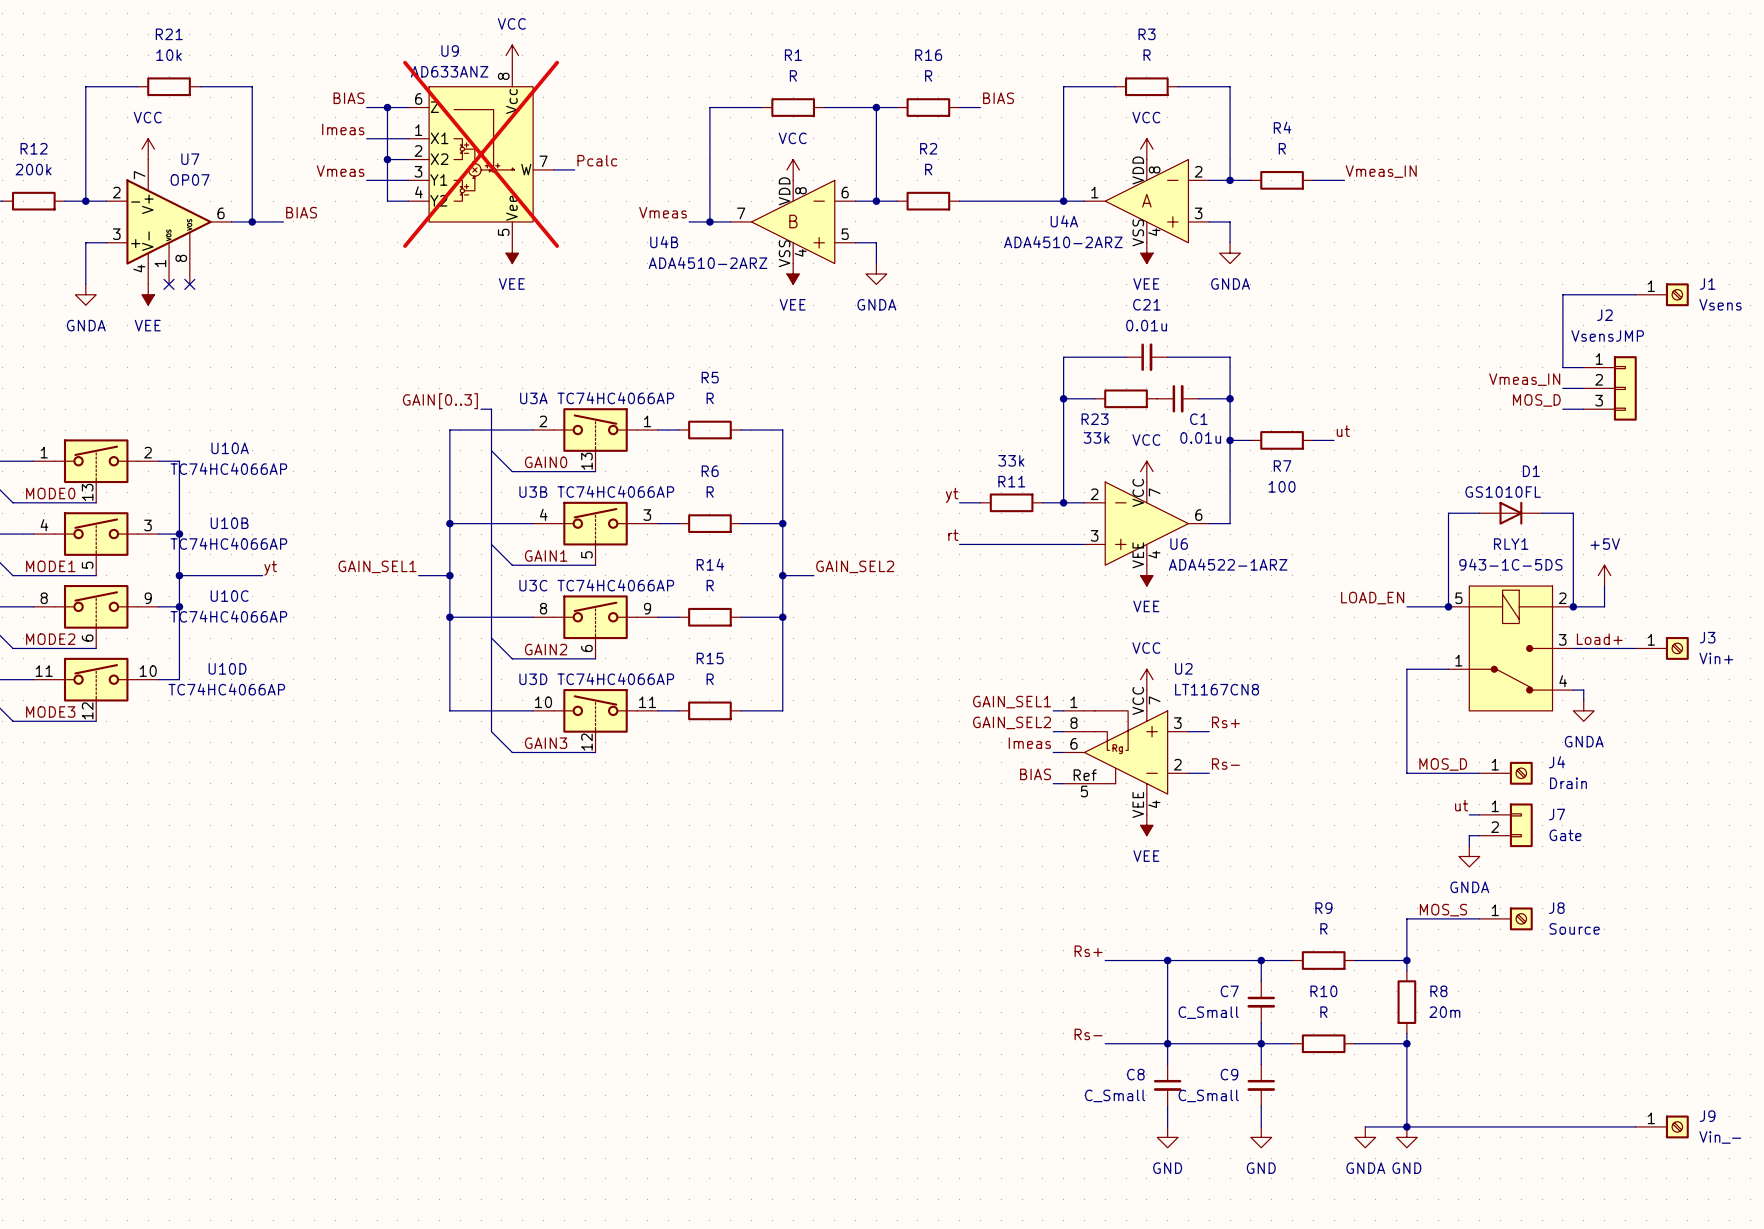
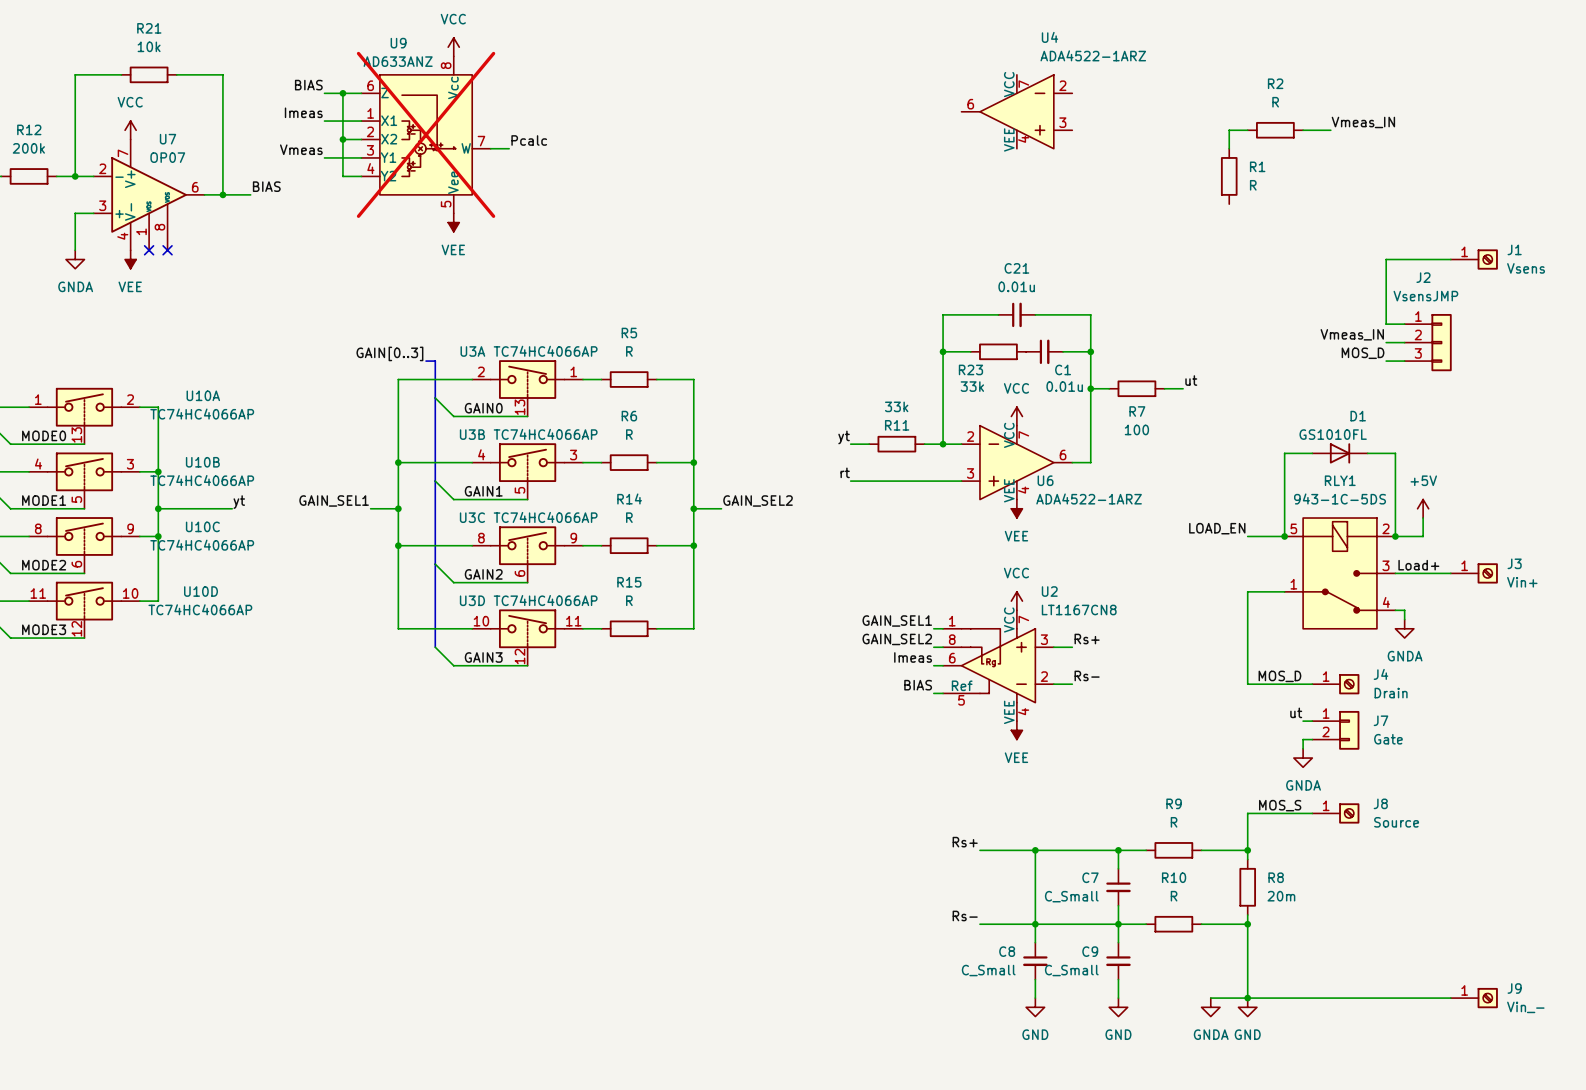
R1 name position: R1 (793, 55) -> R1 (1257, 166)
wire: (1115, 86) (1063, 86) (1063, 201) -> none
R3: R (1146, 86) -> none
wire: (1178, 86) (1230, 86) (1230, 180) -> none
label: BIAS (998, 98) -> none
wire: (761, 107) (709, 107) (709, 221) -> none
R1 rotation: 0° (793, 107) -> 90° clockwise (1229, 176)
R1 position: (793, 107) -> (1229, 176)
wire: (824, 107) (897, 107) -> none
wire: (876, 107) (876, 201) -> none
junction: (876, 107) -> none
R16: R (928, 107) -> none
wire: (959, 107) (980, 107) -> none
U4: none -> ADA4522-1ARZ (1016, 111)
power symbol: VCC (1146, 149) -> none
wire: none -> (1247, 130) (1229, 130) (1229, 148)
power symbol: VCC (793, 169) -> none
label position: Vmeas_IN (1381, 171) -> Vmeas_IN (1363, 122)
wire: (1209, 180) (1250, 180) -> none
junction: (1230, 180) -> none
R4: R (1282, 180) -> none
wire: (1313, 180) (1344, 180) -> (1303, 130) (1330, 130)
wire: (855, 201) (897, 201) -> none
junction: (876, 201) -> none
R2 position: (928, 201) -> (1275, 130)
wire: (959, 201) (1084, 201) -> none
junction: (1063, 201) -> none
U4A: ADA4510-2ARZ (1146, 201) -> none
label: Vmeas (663, 212) -> none
wire: (689, 221) (730, 221) -> none
junction: (709, 221) -> none
U4B: ADA4510-2ARZ (793, 221) -> none
wire: (1209, 221) (1230, 221) (1230, 242) -> none
wire: (855, 242) (876, 242) (876, 263) -> none
power symbol: VEE (1146, 253) -> none
power symbol: GNDA (1230, 253) -> none
power symbol: VEE (793, 273) -> none
power symbol: GNDA (876, 273) -> none

